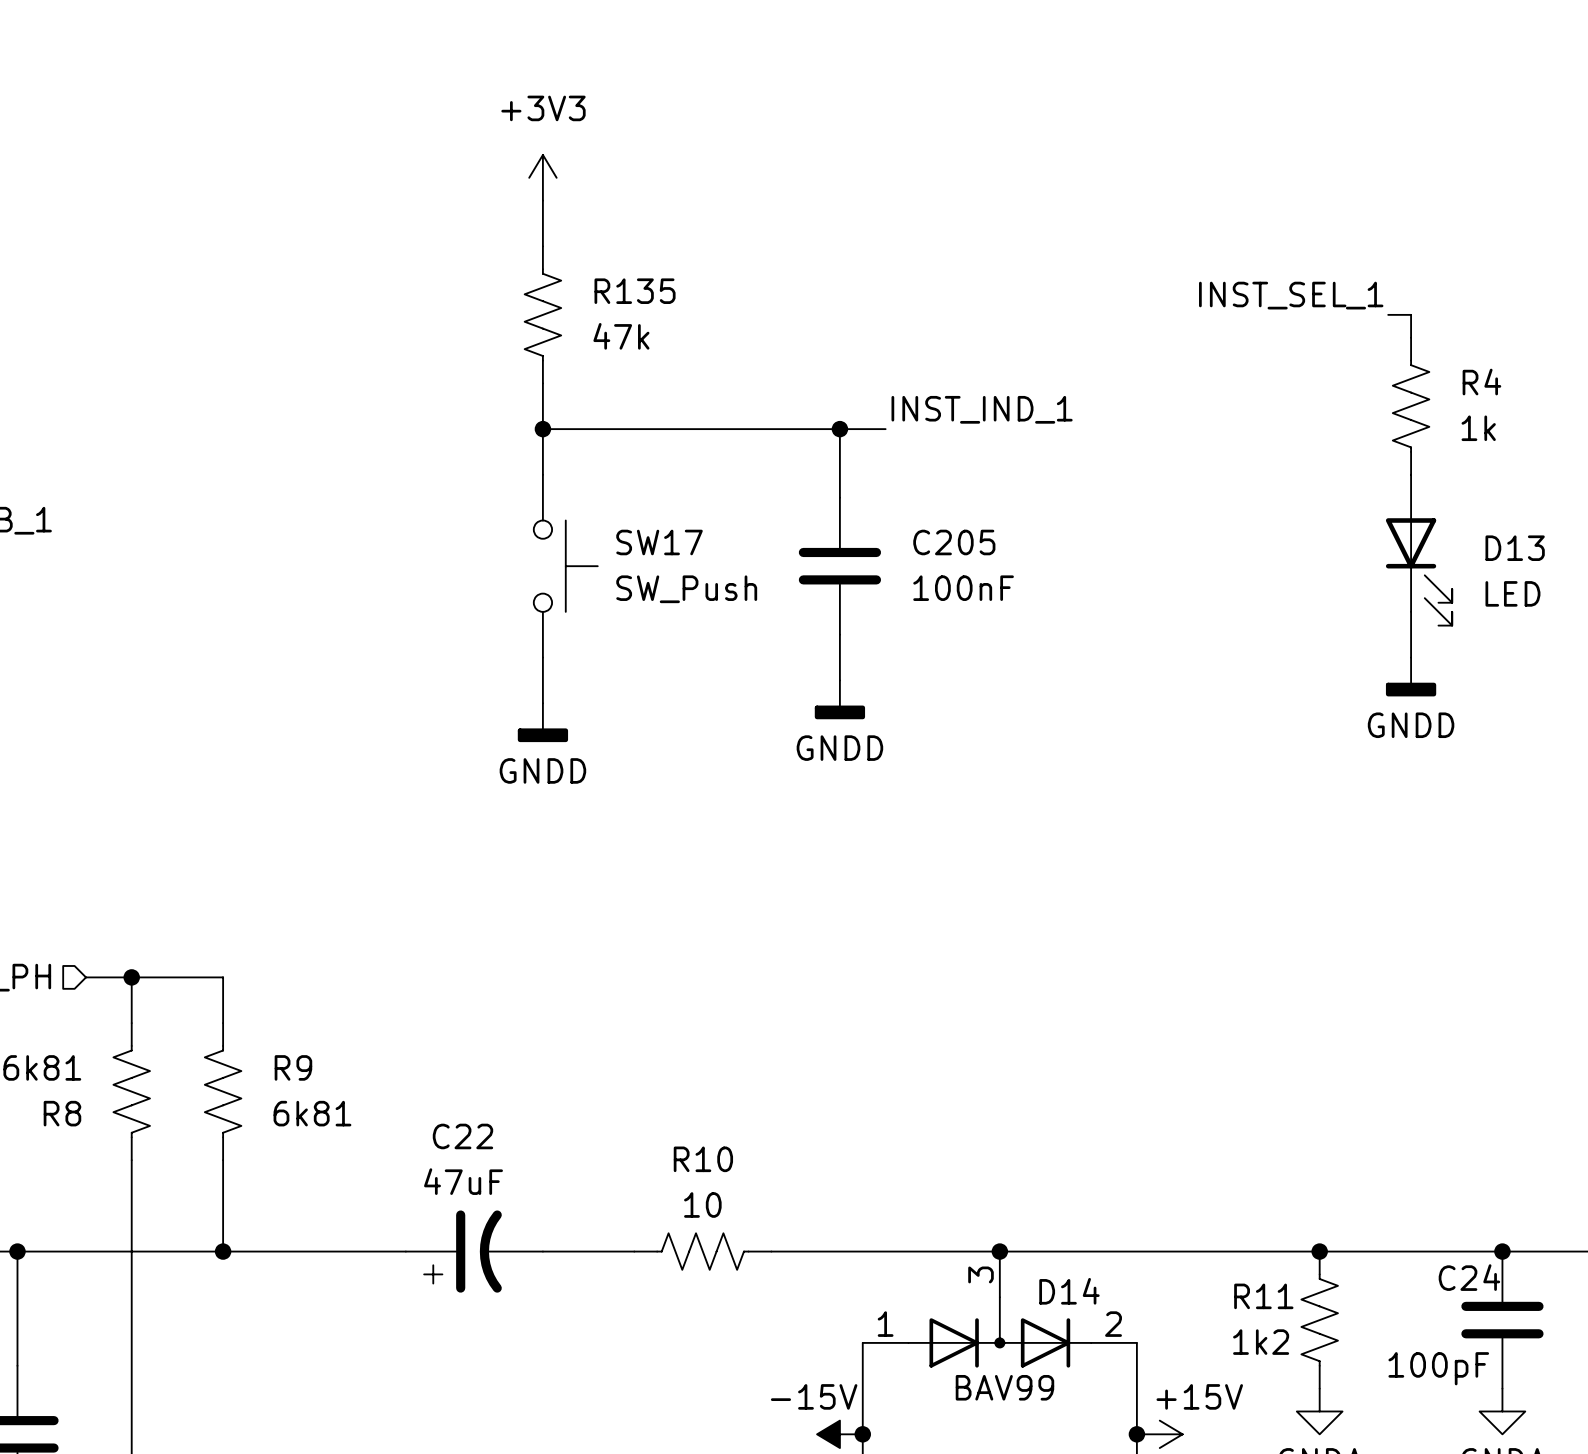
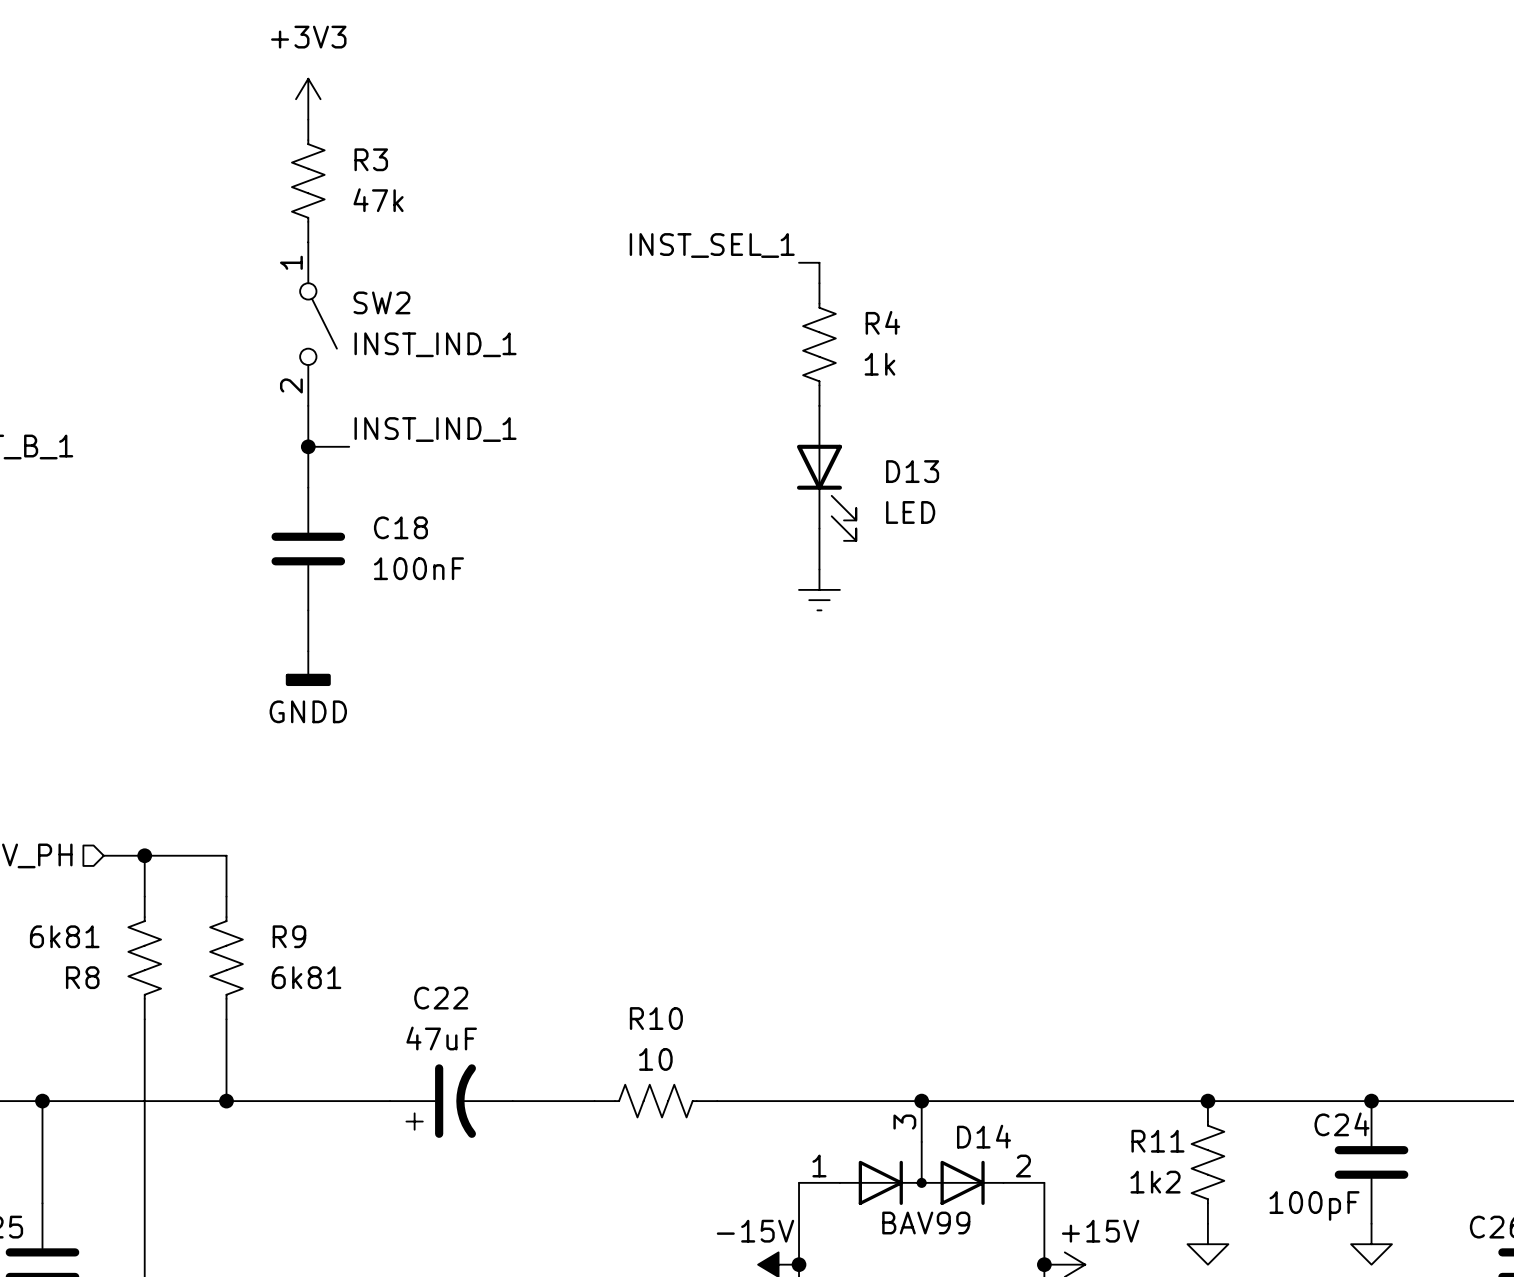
power symbol position: +3V3 (542, 177) -> +3V3 (308, 99)
wire: (542, 200) (542, 246) -> none
R3: none -> 47k (308, 180)
label: none -> INST_SEL_1 (712, 245)
label: INST_SEL_1 (1291, 295) -> none
R135: 47k (542, 314) -> none
wire: none -> (799, 262) (819, 262) (819, 283)
wire: (1388, 314) (1411, 314) (1411, 337) -> none
SW2: none -> INST_IND_1 (318, 324)
wire: (542, 383) (542, 474) -> (308, 405) (308, 487)
R4 position: (1411, 406) -> (819, 344)
label: INST_IND_1 (982, 409) -> none
wire: (542, 429) (885, 429) -> none
junction: (542, 429) -> none
wire: (839, 429) (839, 497) -> none
junction: (839, 429) -> none
label: none -> INST_IND_1 (435, 429)
wire: none -> (308, 446) (349, 446)
junction: none -> (308, 446)
D13 position: (1419, 550) -> (826, 473)
SW17: SW_Push (565, 566) -> none
C205: 100nF (839, 566) -> none
wire: (1411, 611) (1411, 657) -> none
C18: none -> 100nF (308, 549)
wire: (839, 634) (839, 680) -> (819, 528) (819, 569)
wire: (542, 657) (542, 703) -> (308, 610) (308, 651)
power symbol: GNDD (1411, 676) -> none
power symbol: none -> (819, 589)
power symbol: GNDD (839, 699) -> none
power symbol position: GNDD (542, 722) -> GNDD (308, 668)

